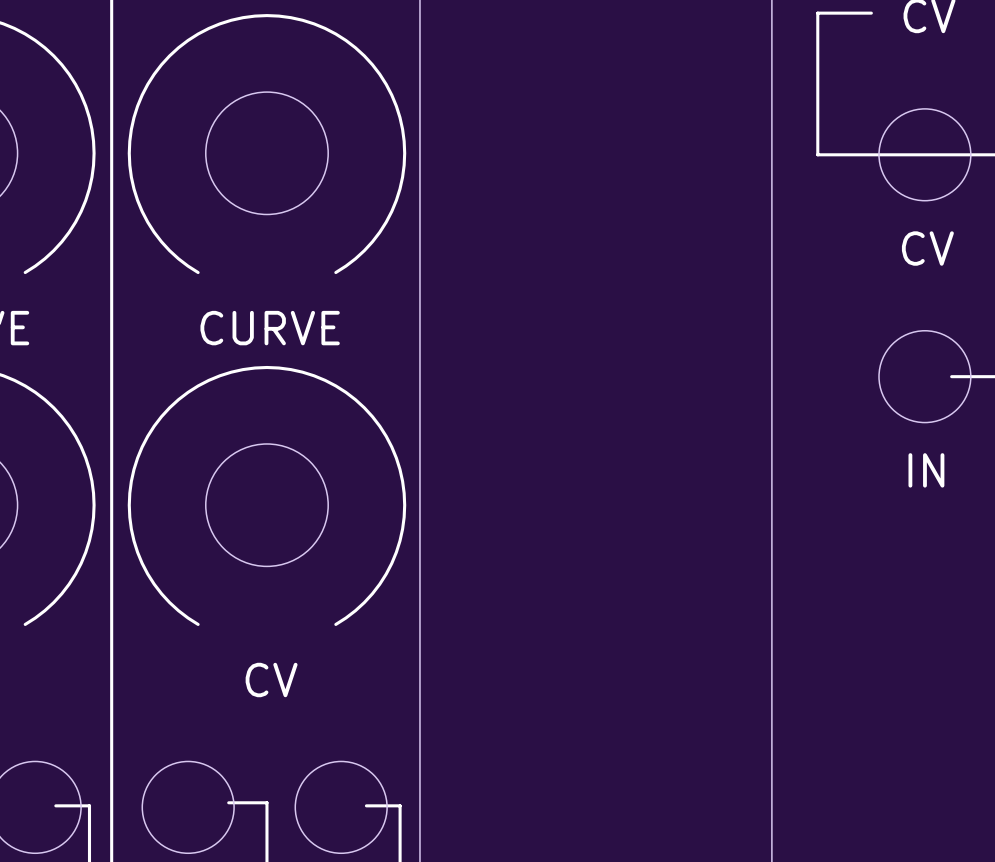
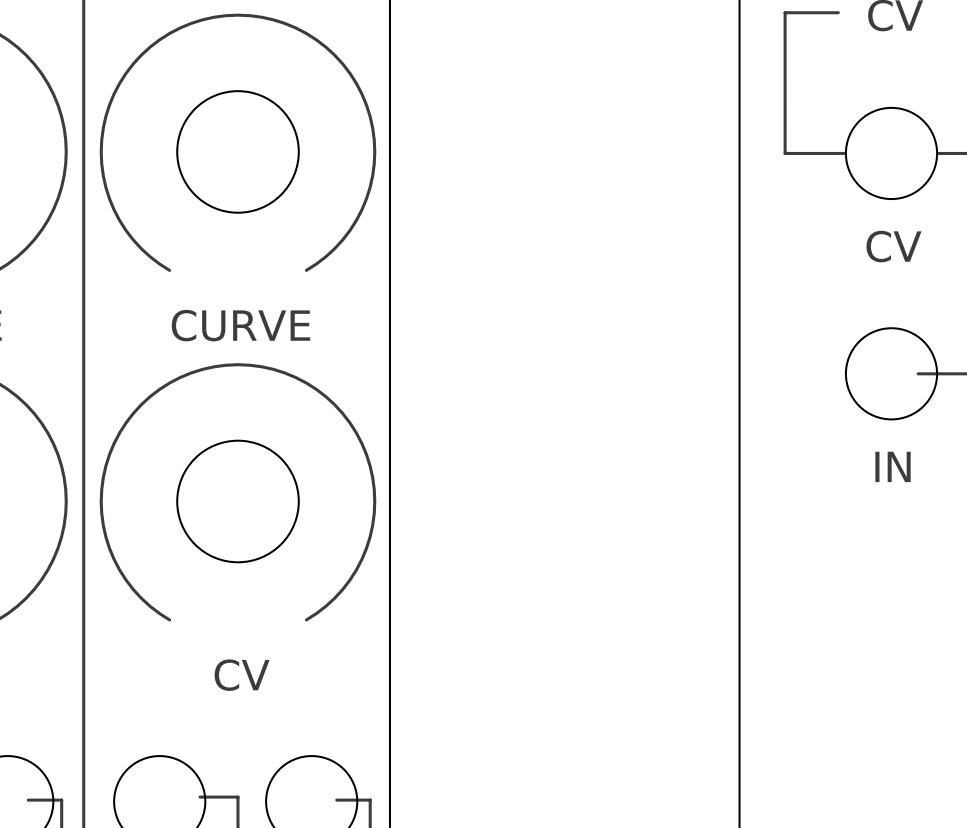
line: (877, 154) (972, 154) -> none

